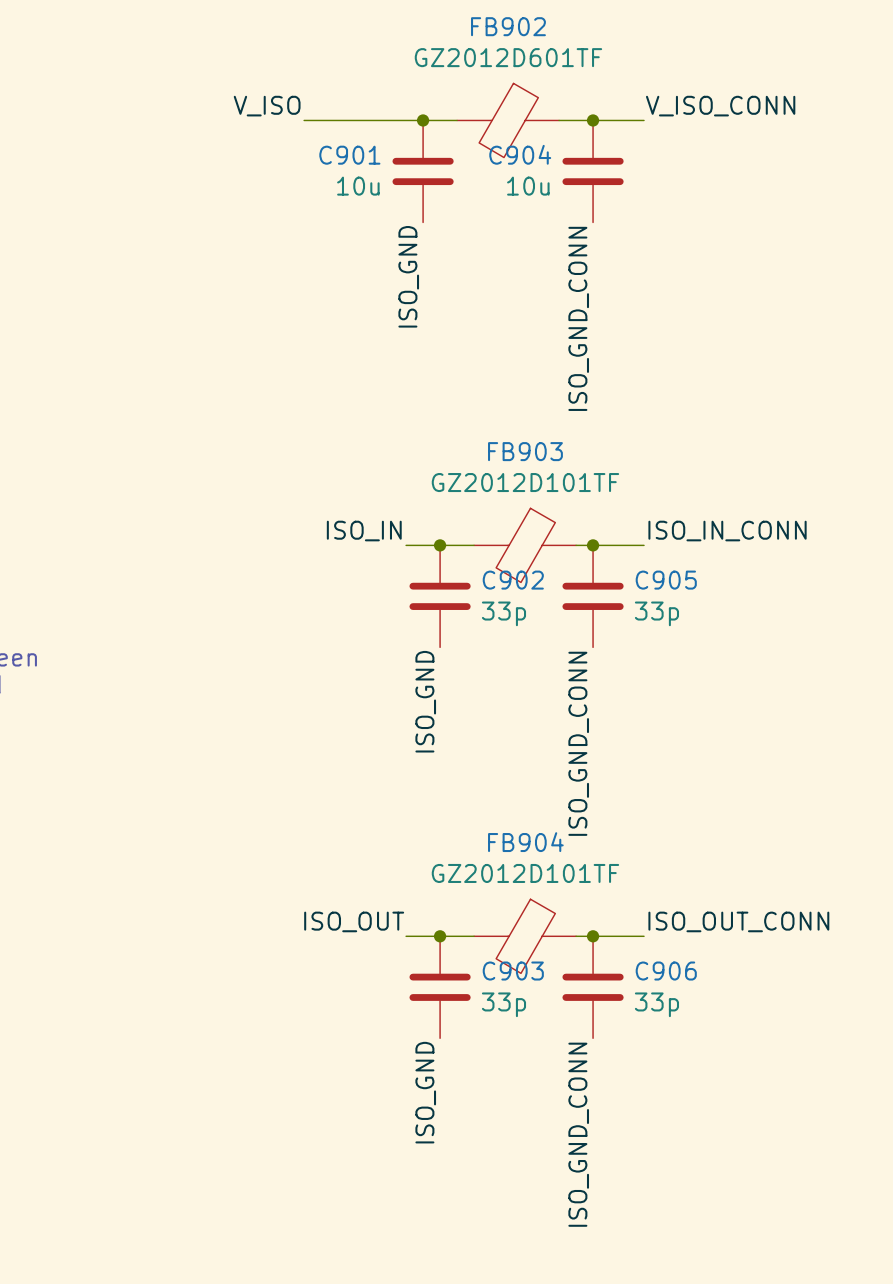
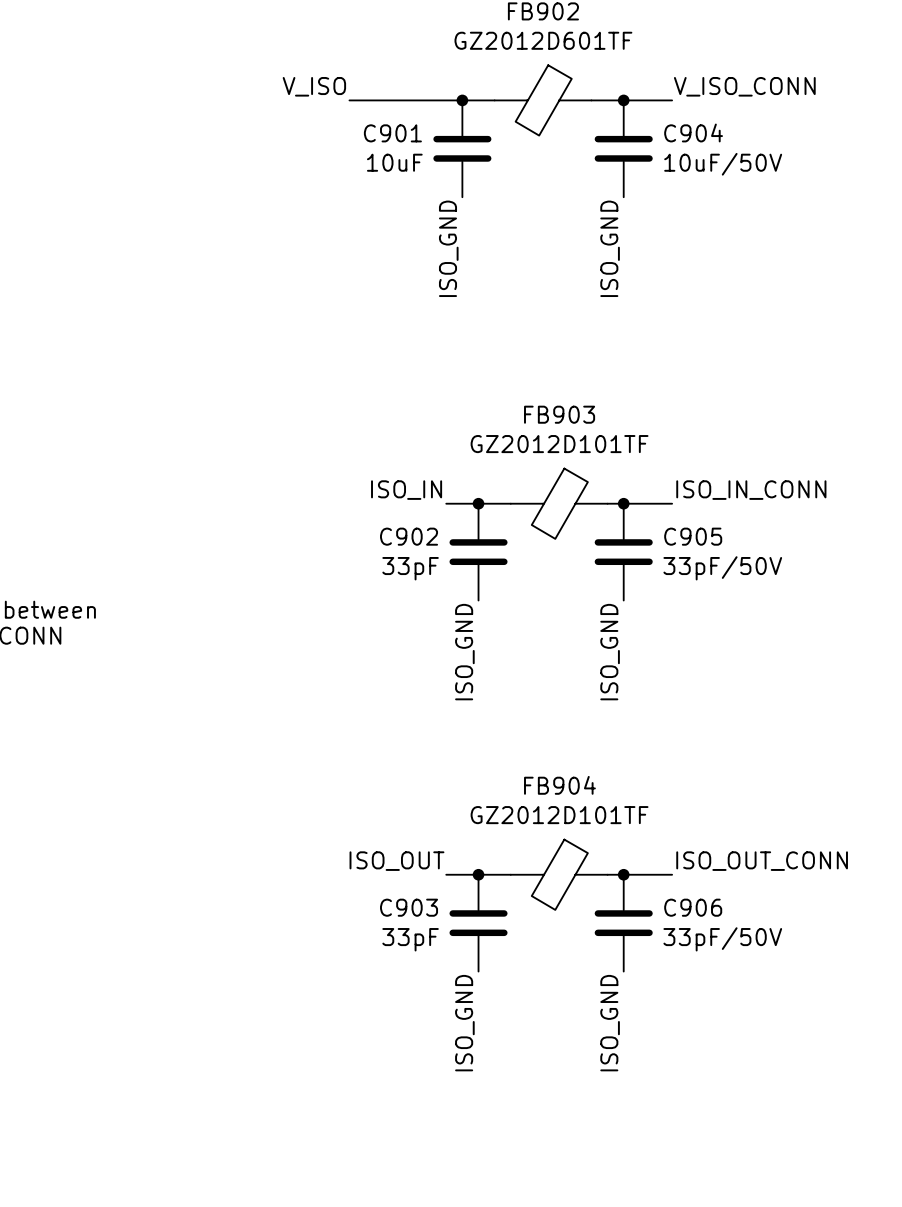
C904 name position: C904 (520, 154) -> C904 (693, 132)
C901 value: 10u (358, 186) -> 10uF (394, 162)
C904 value: 10u (528, 186) -> 10uF/50V (723, 164)
label: ISO_GND_CONN (578, 318) -> ISO_GND (610, 248)
C902 name position: C902 (513, 580) -> C902 (409, 536)
C902 value: 33p (503, 613) -> 33pF (410, 568)
C905 value: 33p (656, 613) -> 33pF/50V (722, 568)
label: ISO_GND_CONN (578, 743) -> ISO_GND (610, 652)
C903 name position: C903 (513, 971) -> C903 (409, 907)
C903 value: 33p (503, 1004) -> 33pF (410, 939)
C906 value: 33p (656, 1004) -> 33pF/50V (722, 939)
label: ISO_GND_CONN (578, 1134) -> ISO_GND (610, 1023)

